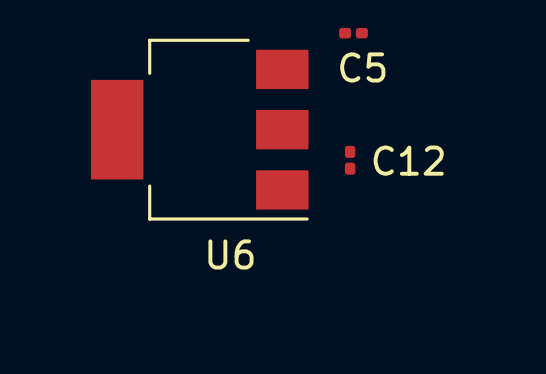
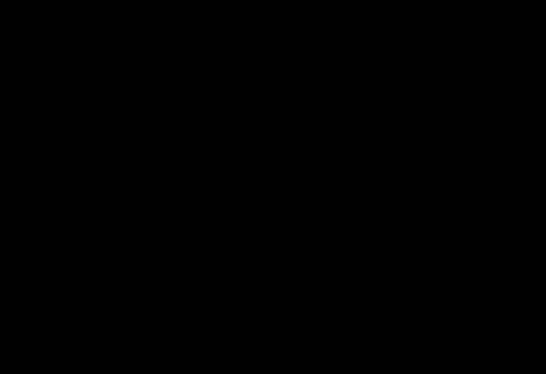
C5: (353, 33) -> none
U6: (199, 129) -> none
C12: (350, 160) -> none

